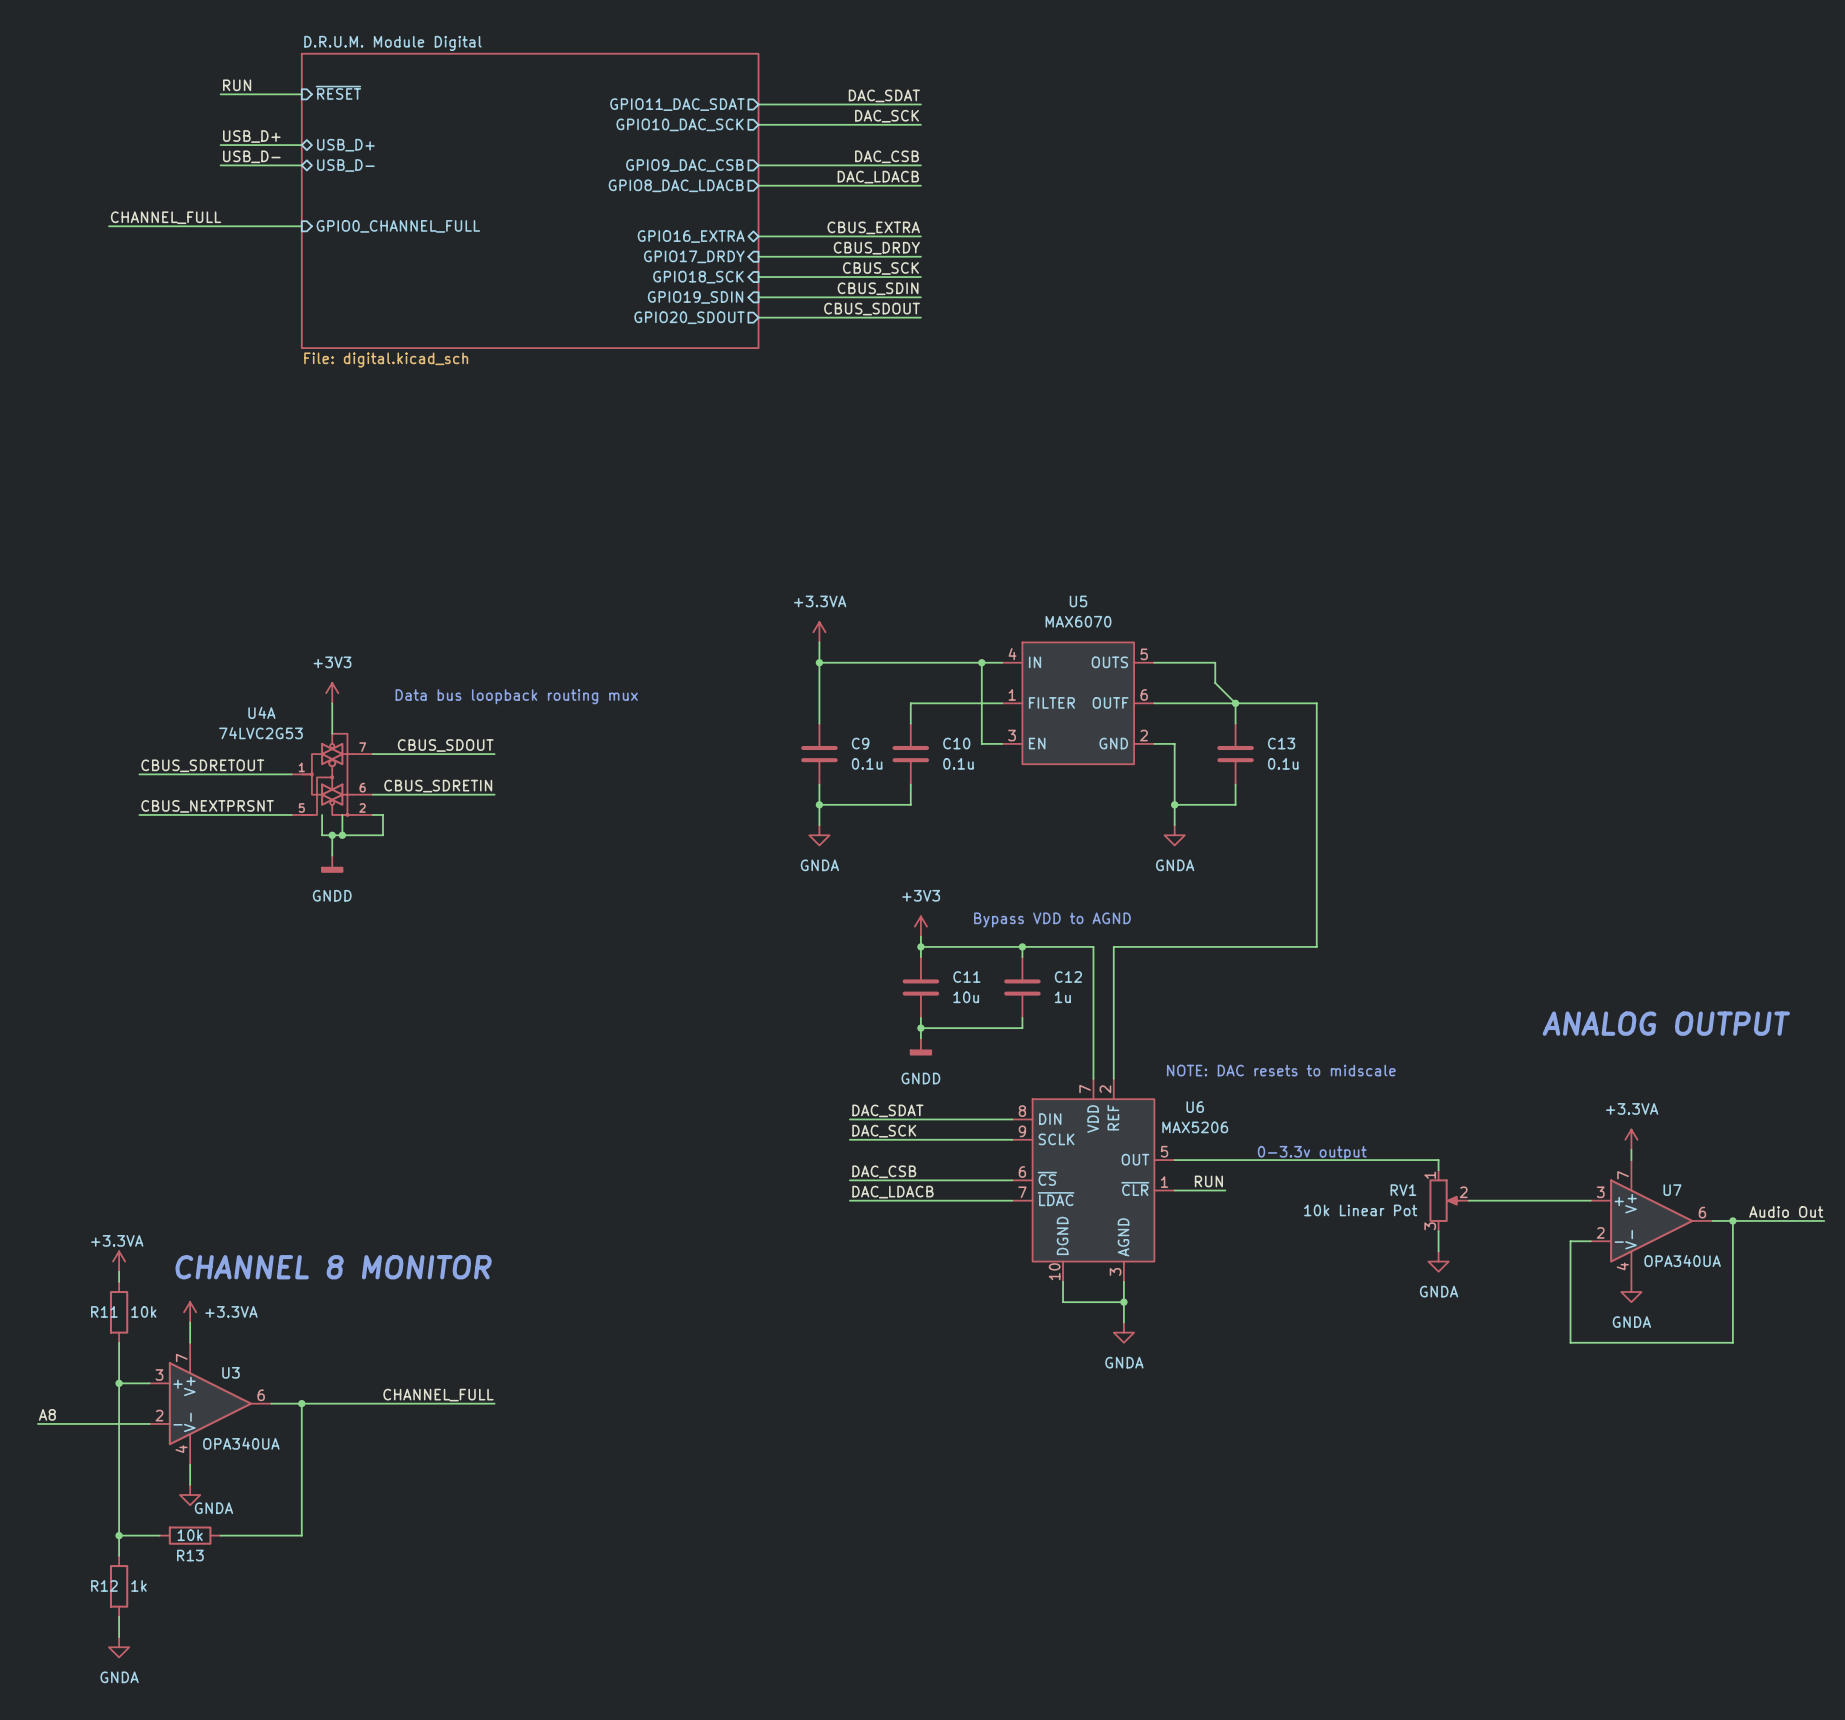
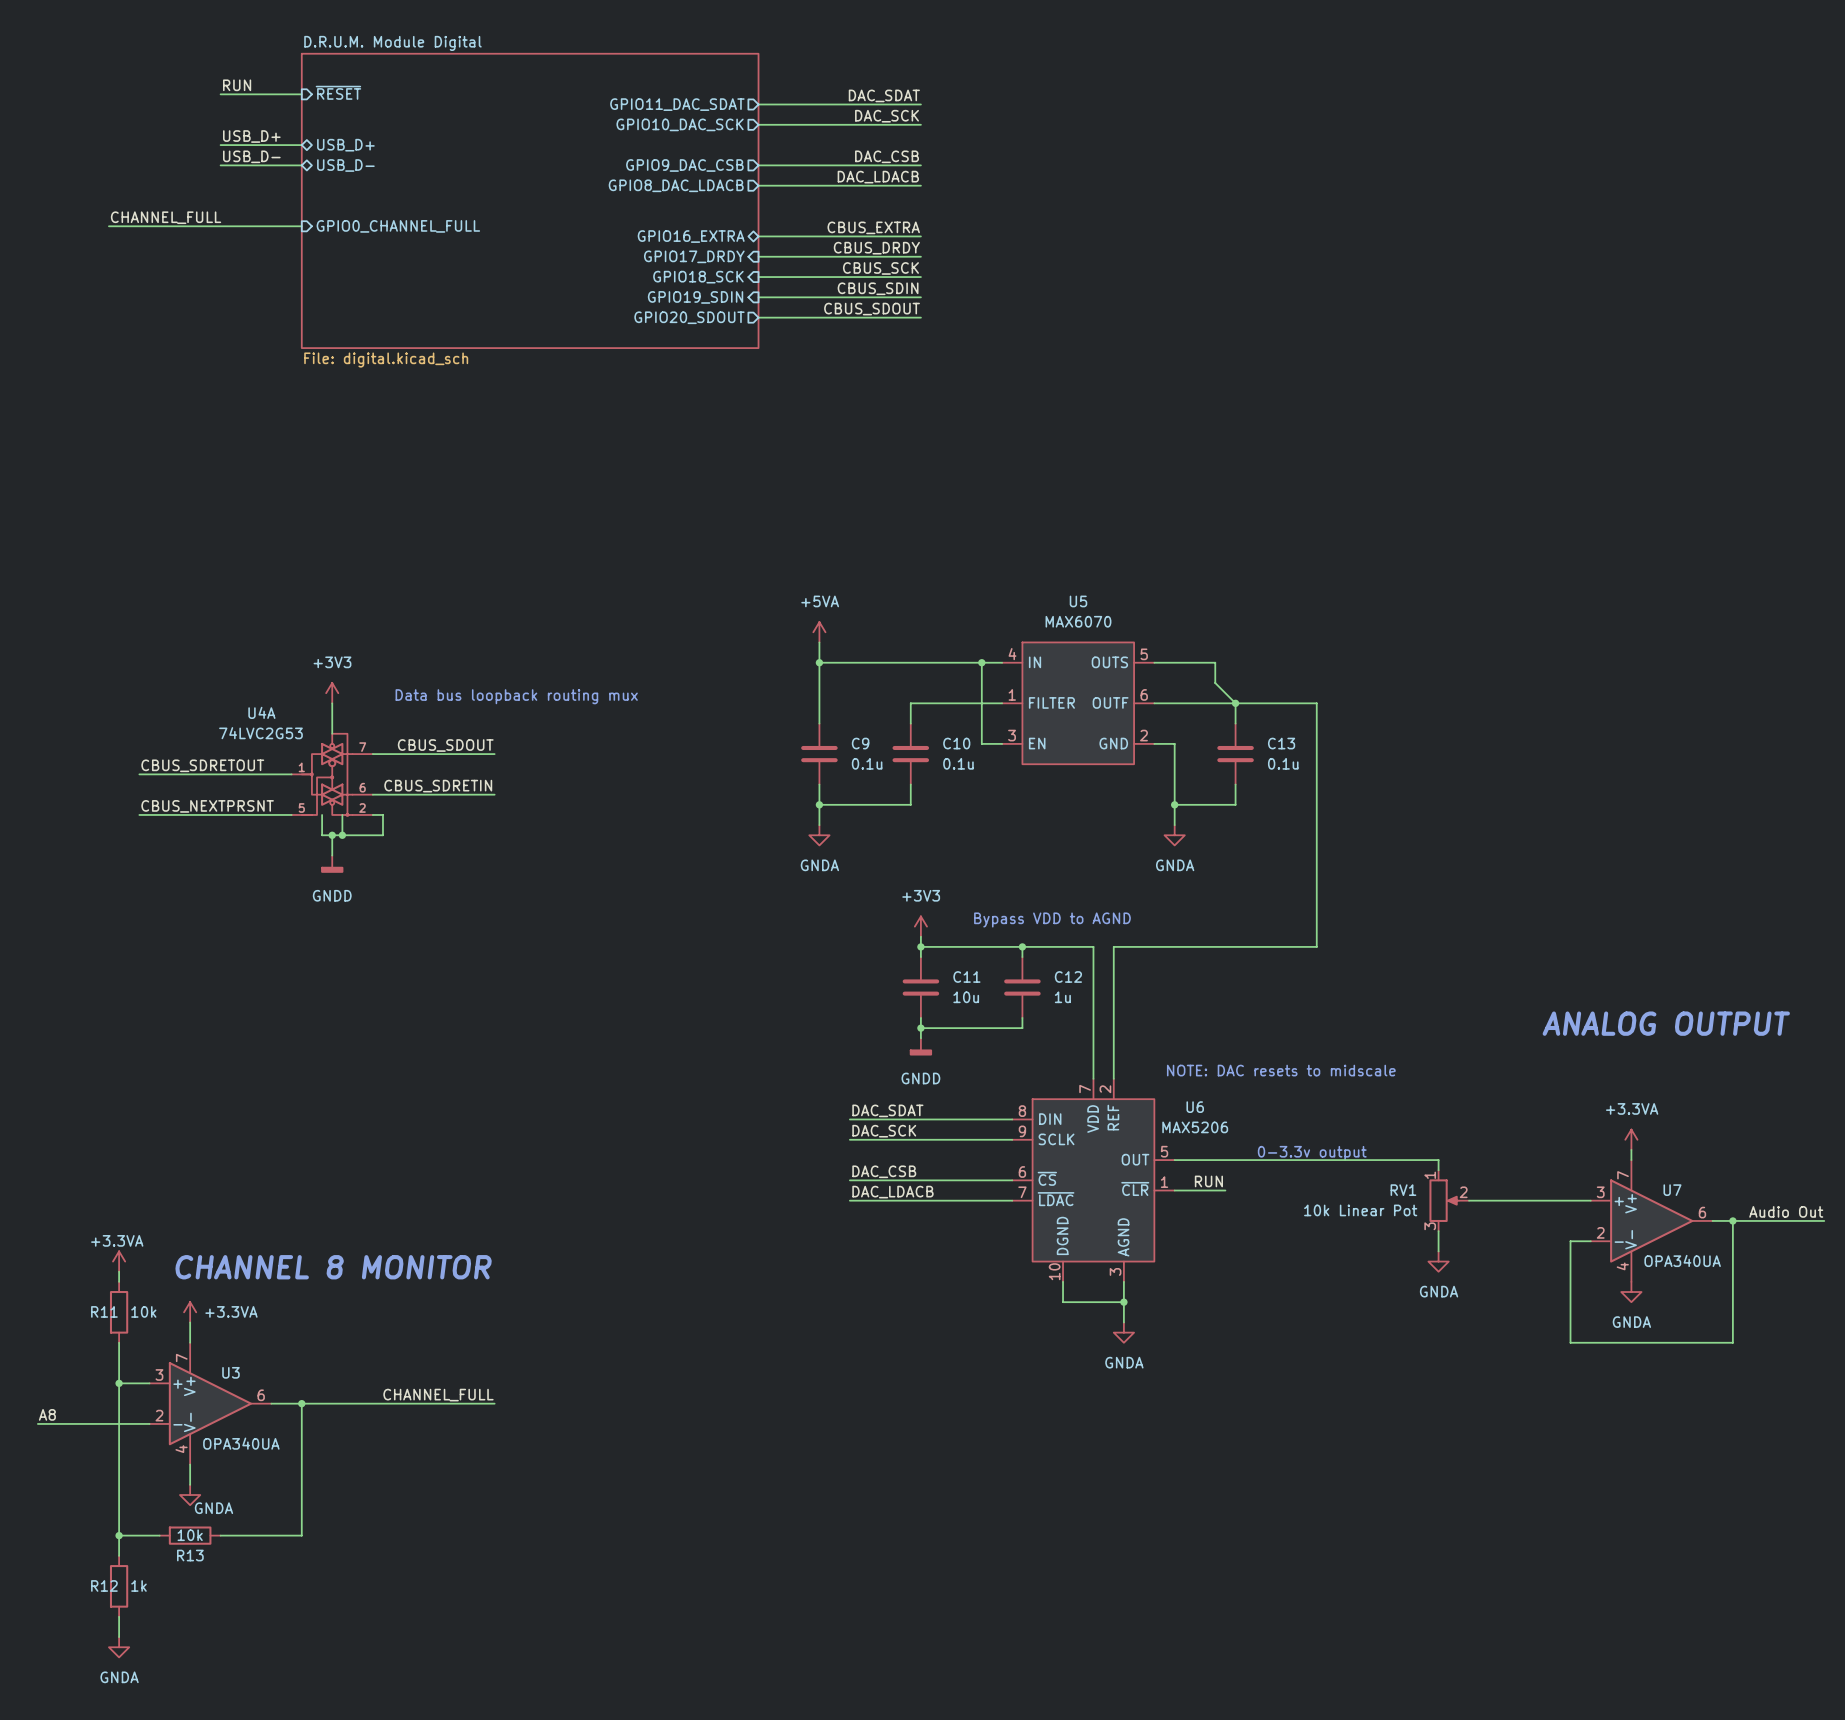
power symbol: +3.3VA (819, 632) -> +5VA (819, 632)

